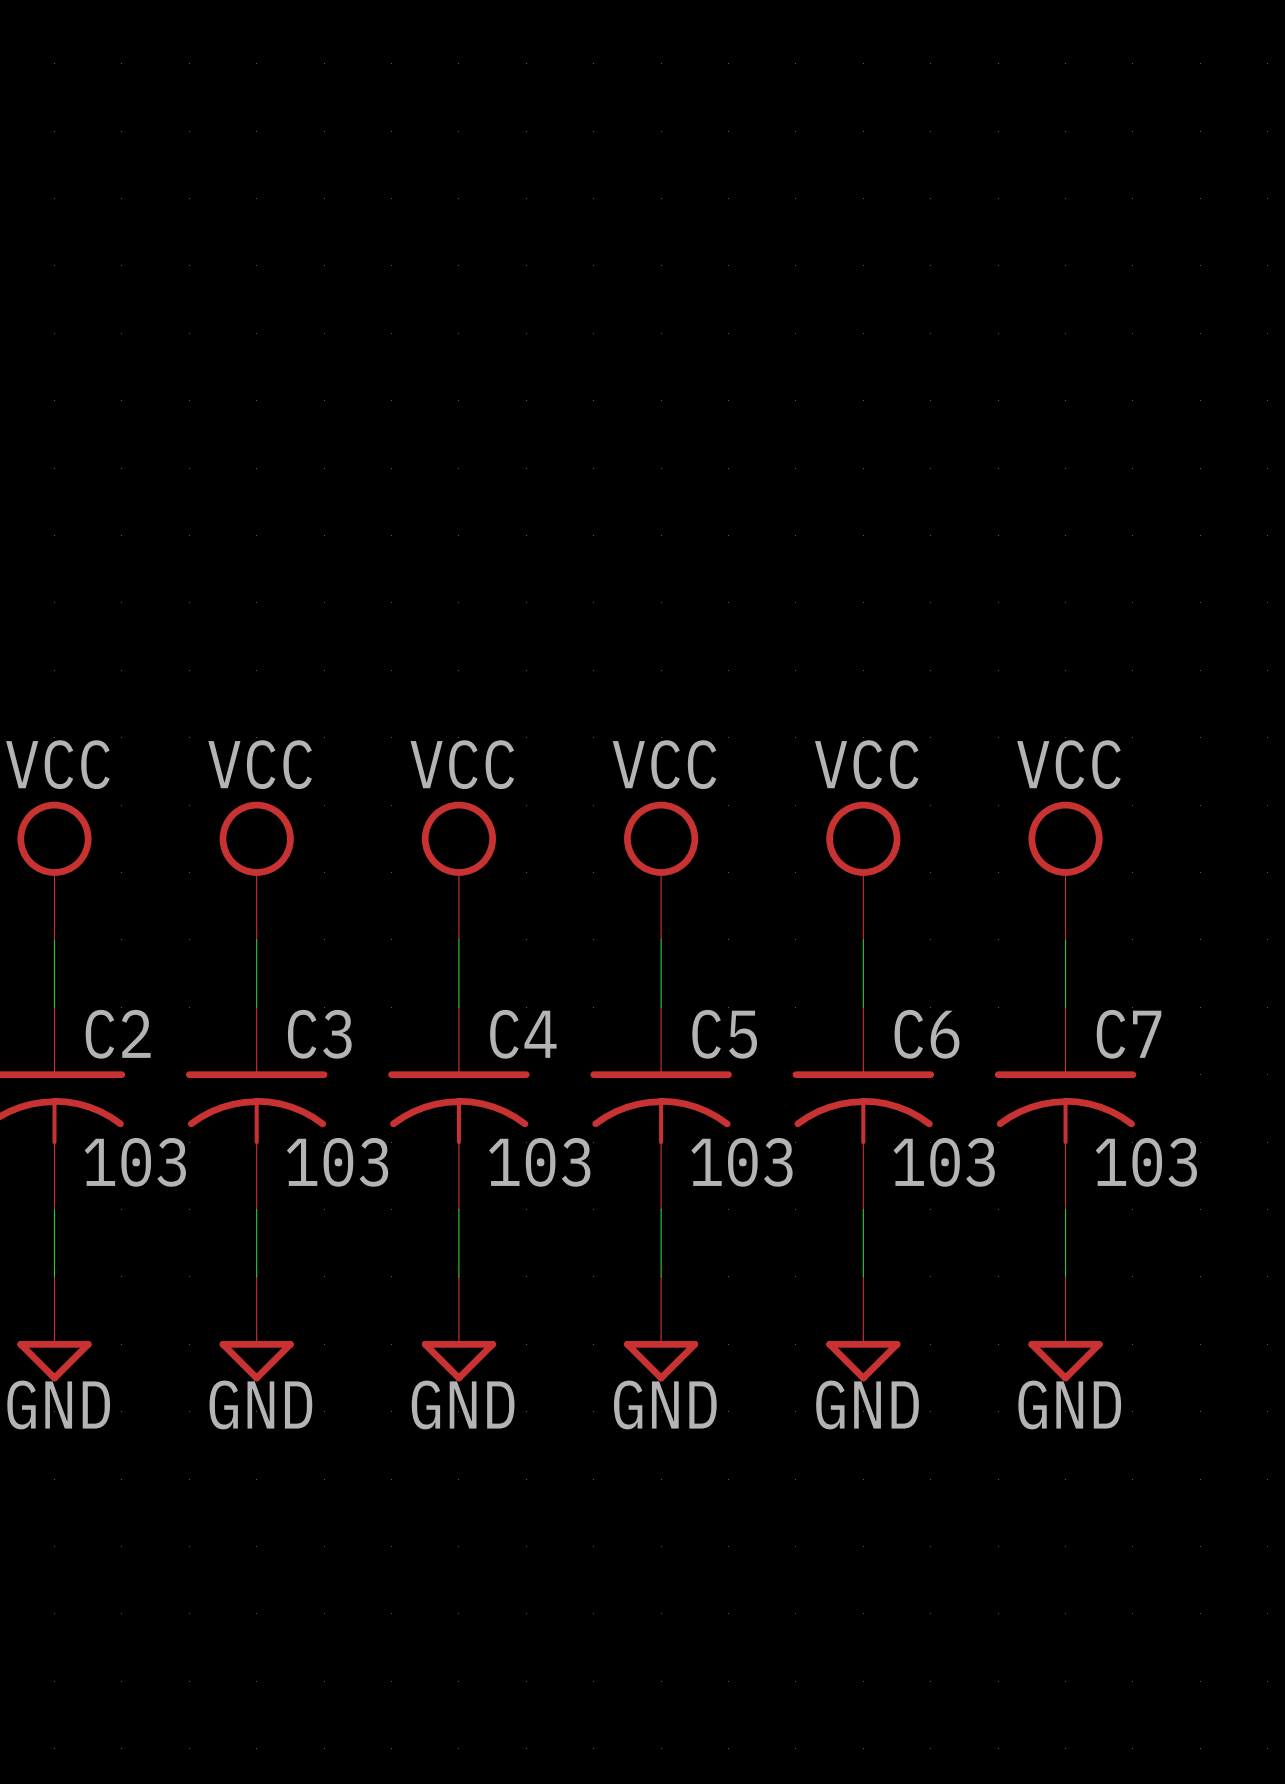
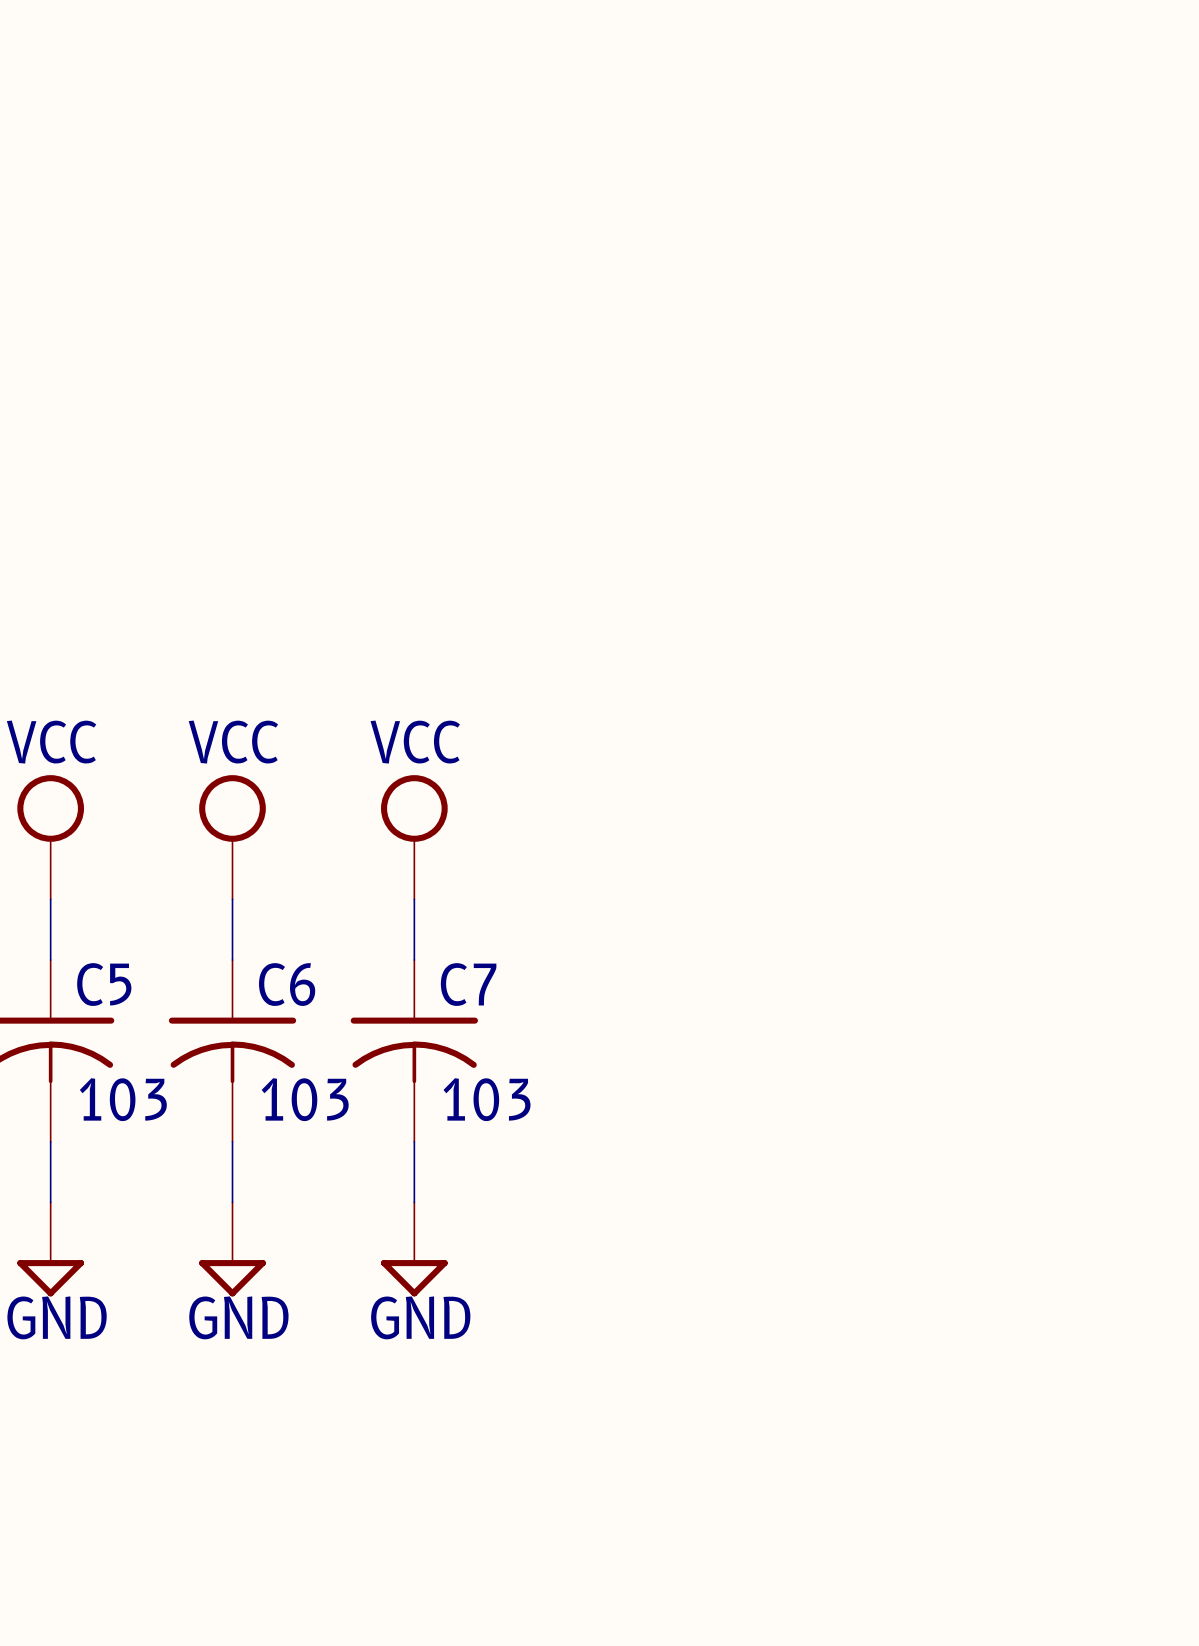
power symbol: VCC (661, 870) -> none
power symbol: VCC (863, 870) -> none
power symbol: VCC (1065, 870) -> none
wire: (661, 939) (661, 1007) -> none
wire: (863, 939) (863, 1007) -> none
wire: (1065, 939) (1065, 1007) -> none
C2 name: C2 (118, 1034) -> C5 (104, 984)
C3 name: C3 (319, 1034) -> C6 (287, 984)
C4 name: C4 (523, 1034) -> C7 (468, 984)
C5: 103 (661, 1108) -> none
C6: 103 (863, 1108) -> none
C7: 103 (1065, 1108) -> none
wire: (661, 1209) (661, 1276) -> none
wire: (863, 1209) (863, 1276) -> none
wire: (1065, 1209) (1065, 1276) -> none
power symbol: GND (661, 1329) -> none
power symbol: GND (863, 1329) -> none
power symbol: GND (1065, 1329) -> none

